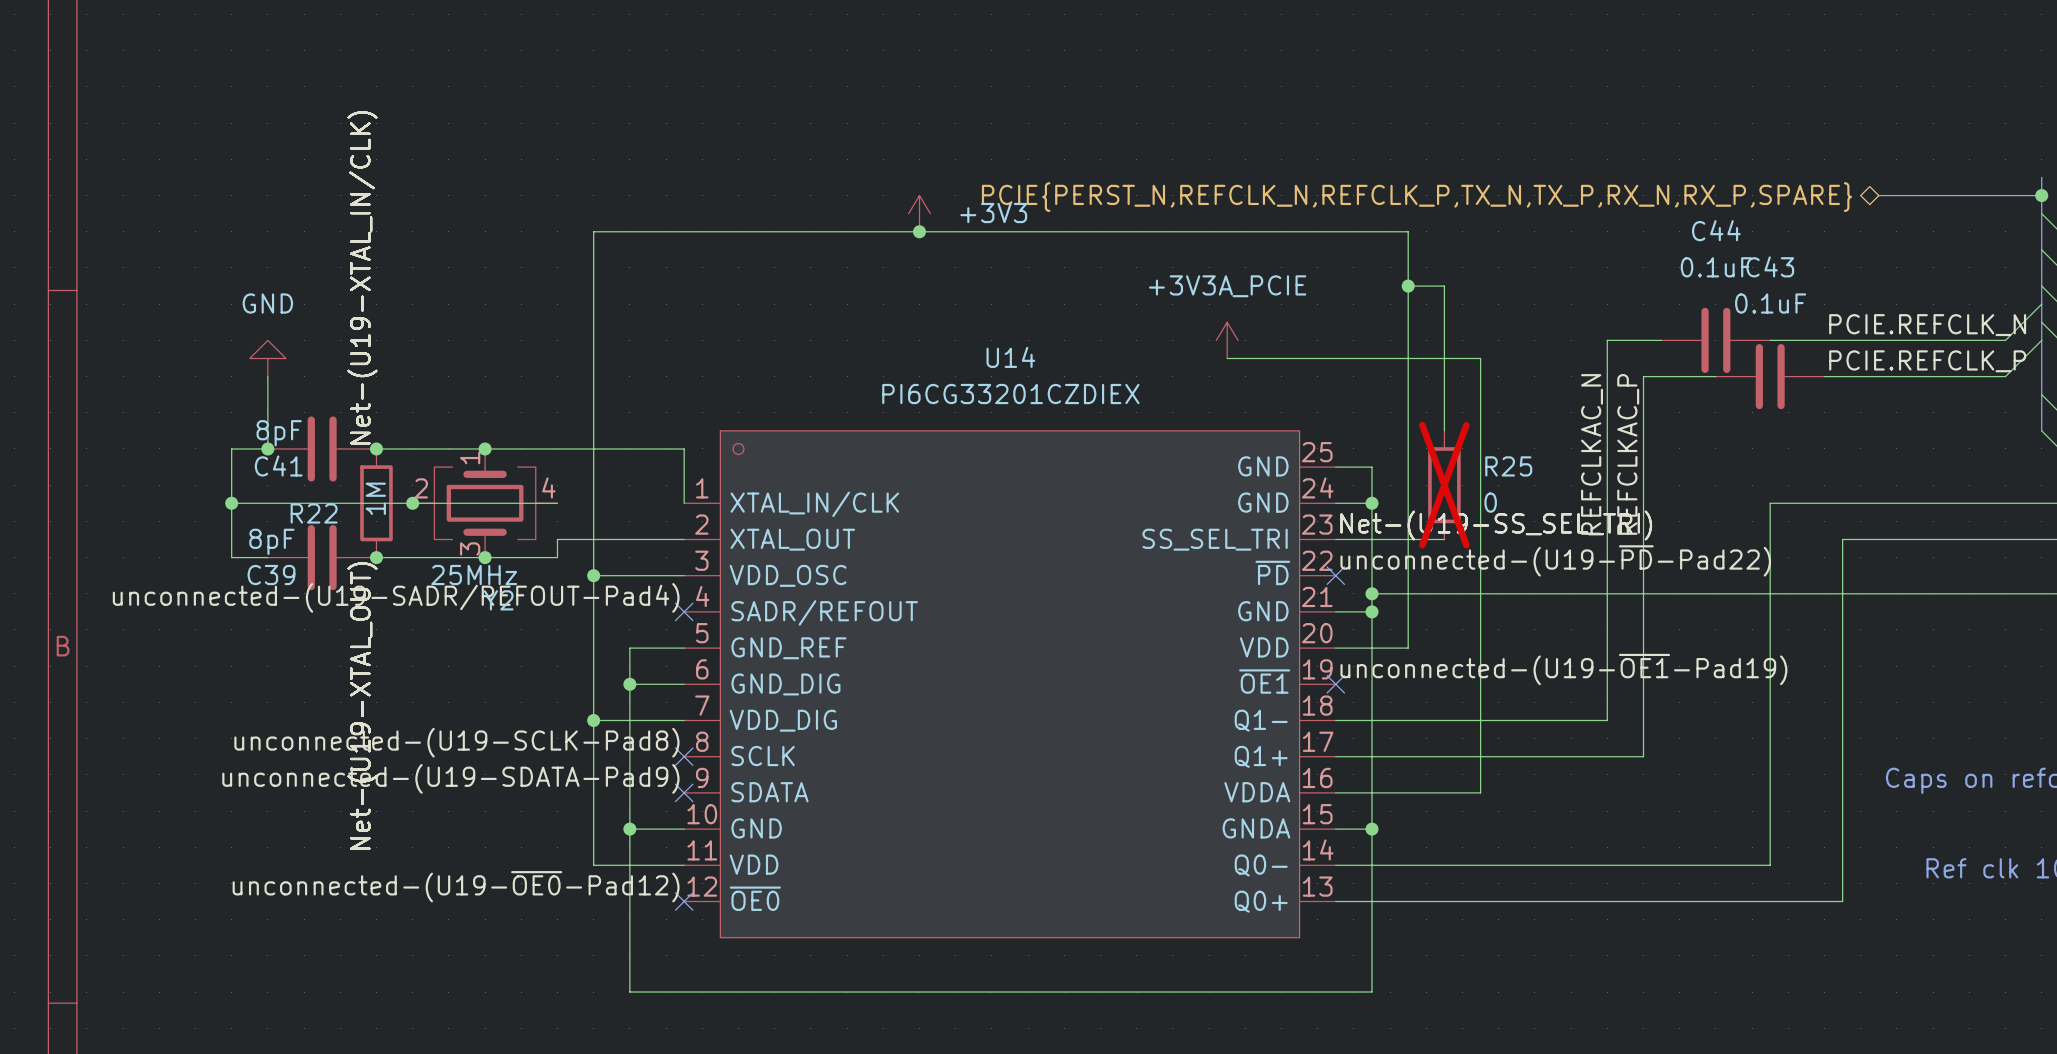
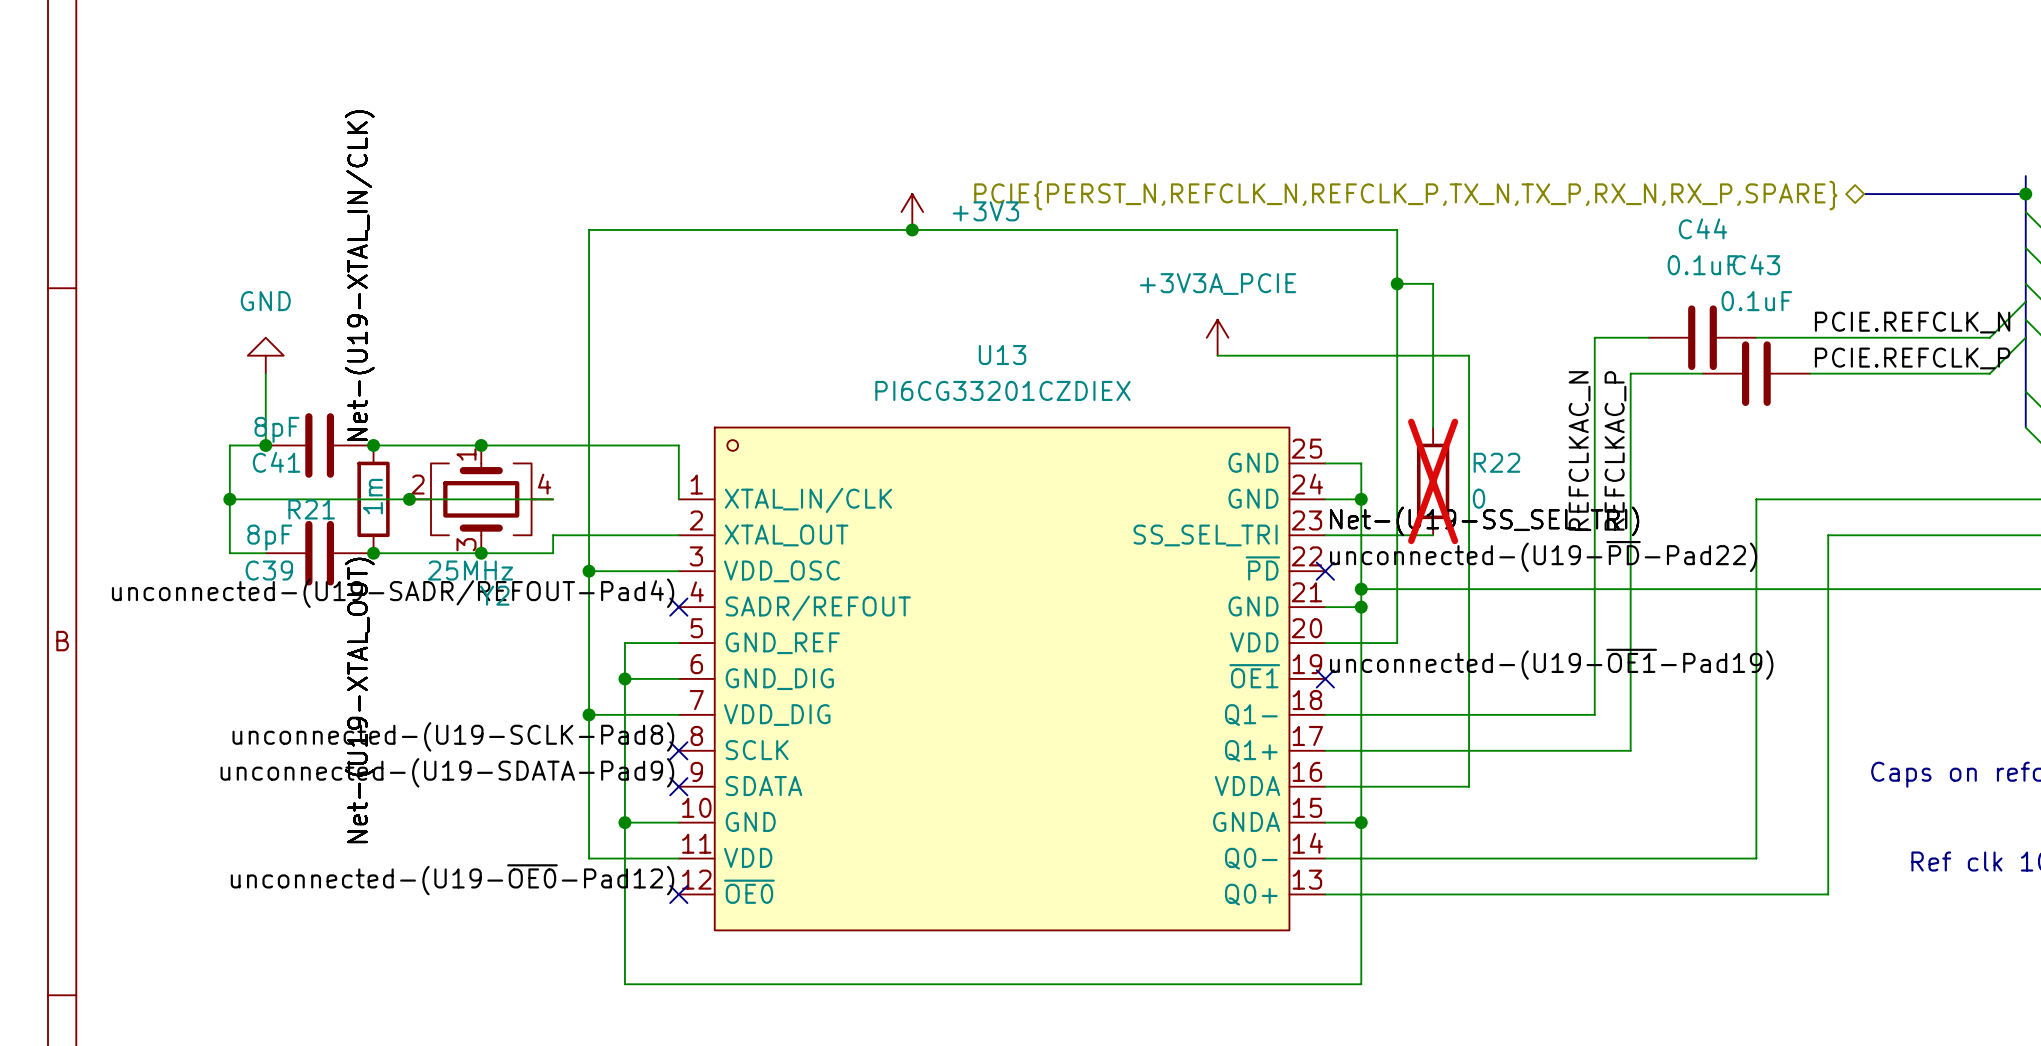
U14 name: U14 (1010, 357) -> U13 (1002, 355)
R25 name: R25 (1508, 466) -> R22 (1496, 462)
R22 value: 1M (375, 498) -> 1m (372, 496)
R22 name: R22 (314, 513) -> R21 (311, 509)

